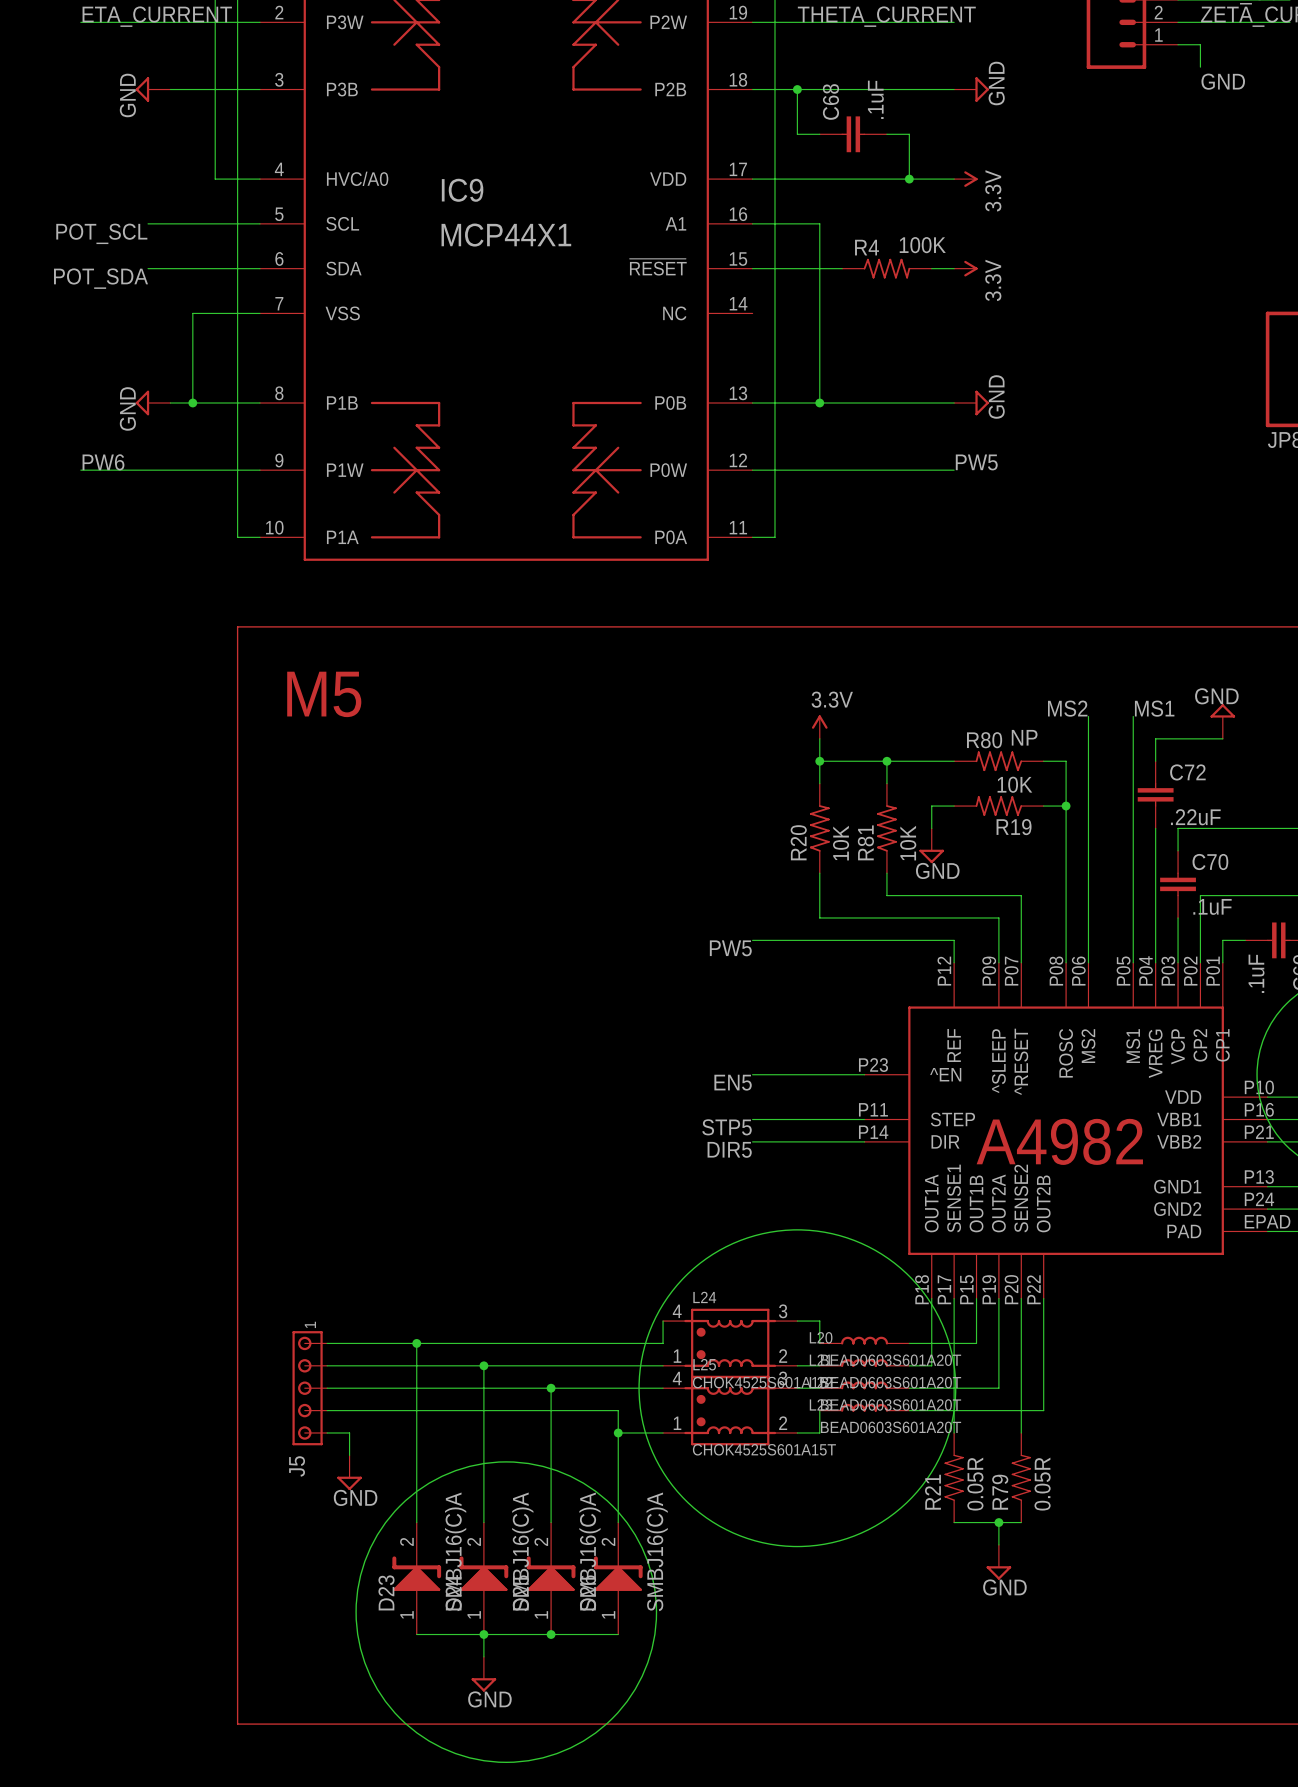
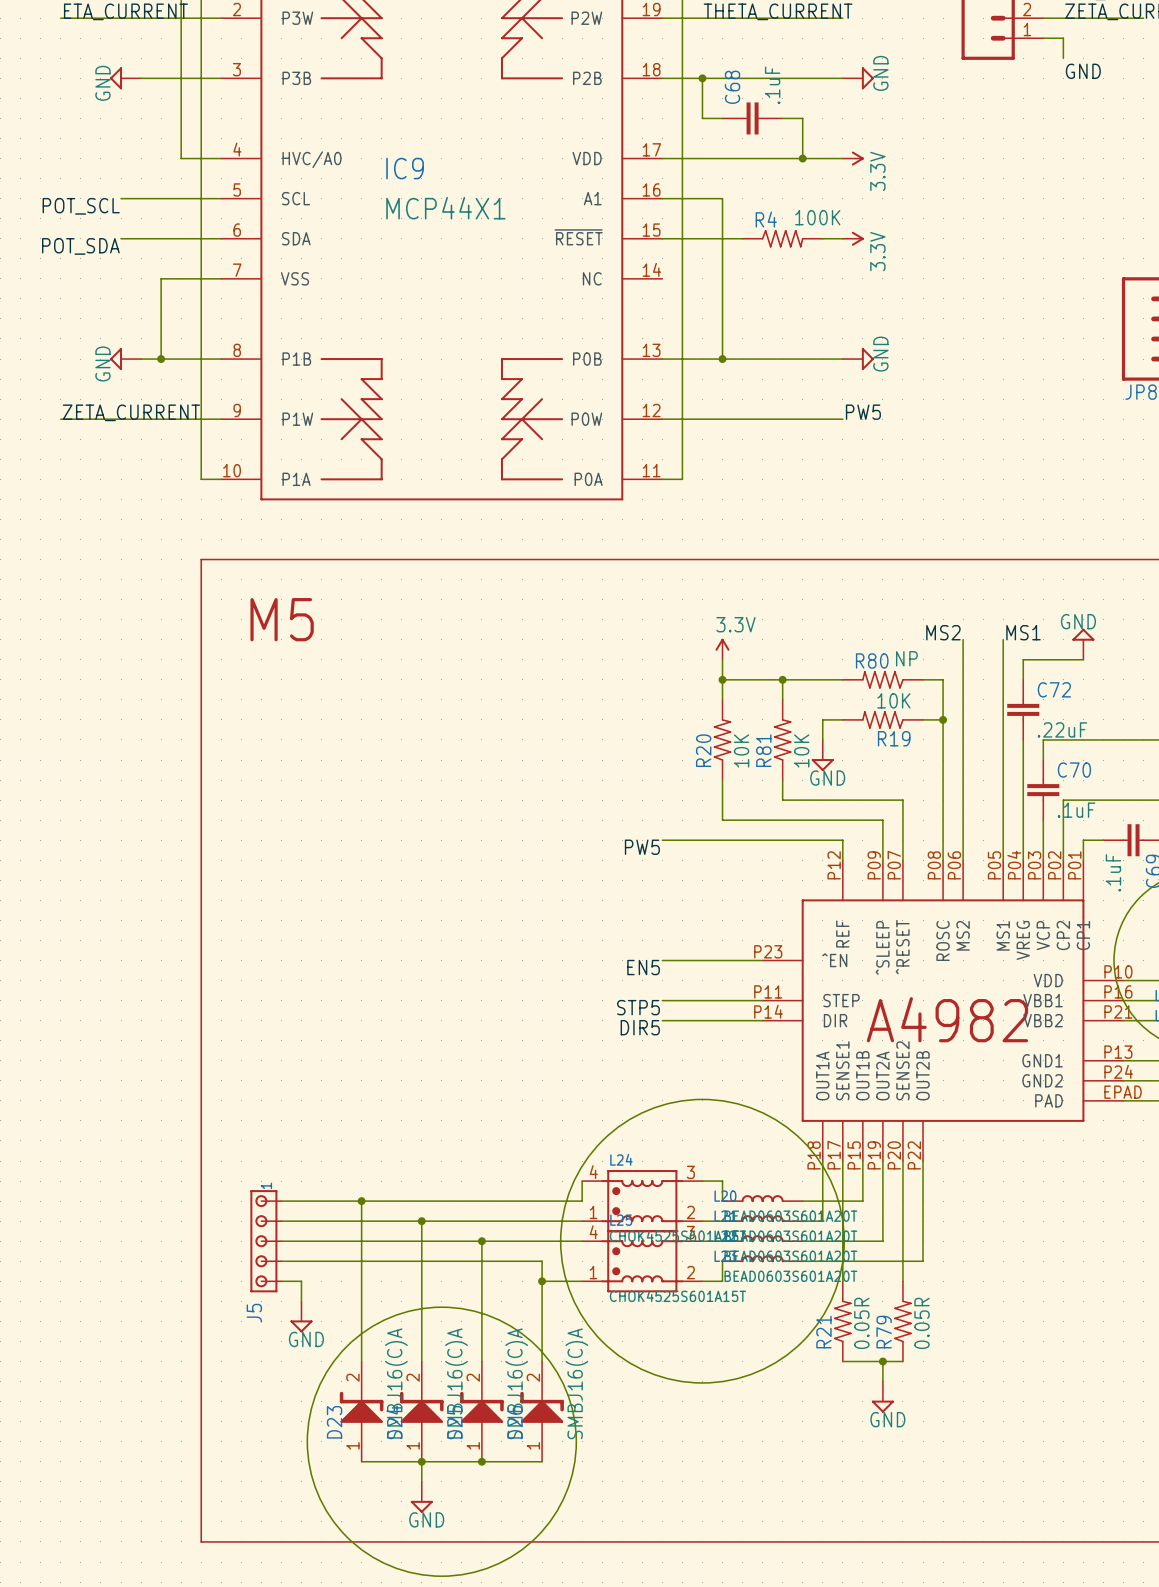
label: PW6 (103, 462) -> ZETA_CURRENT (131, 412)

